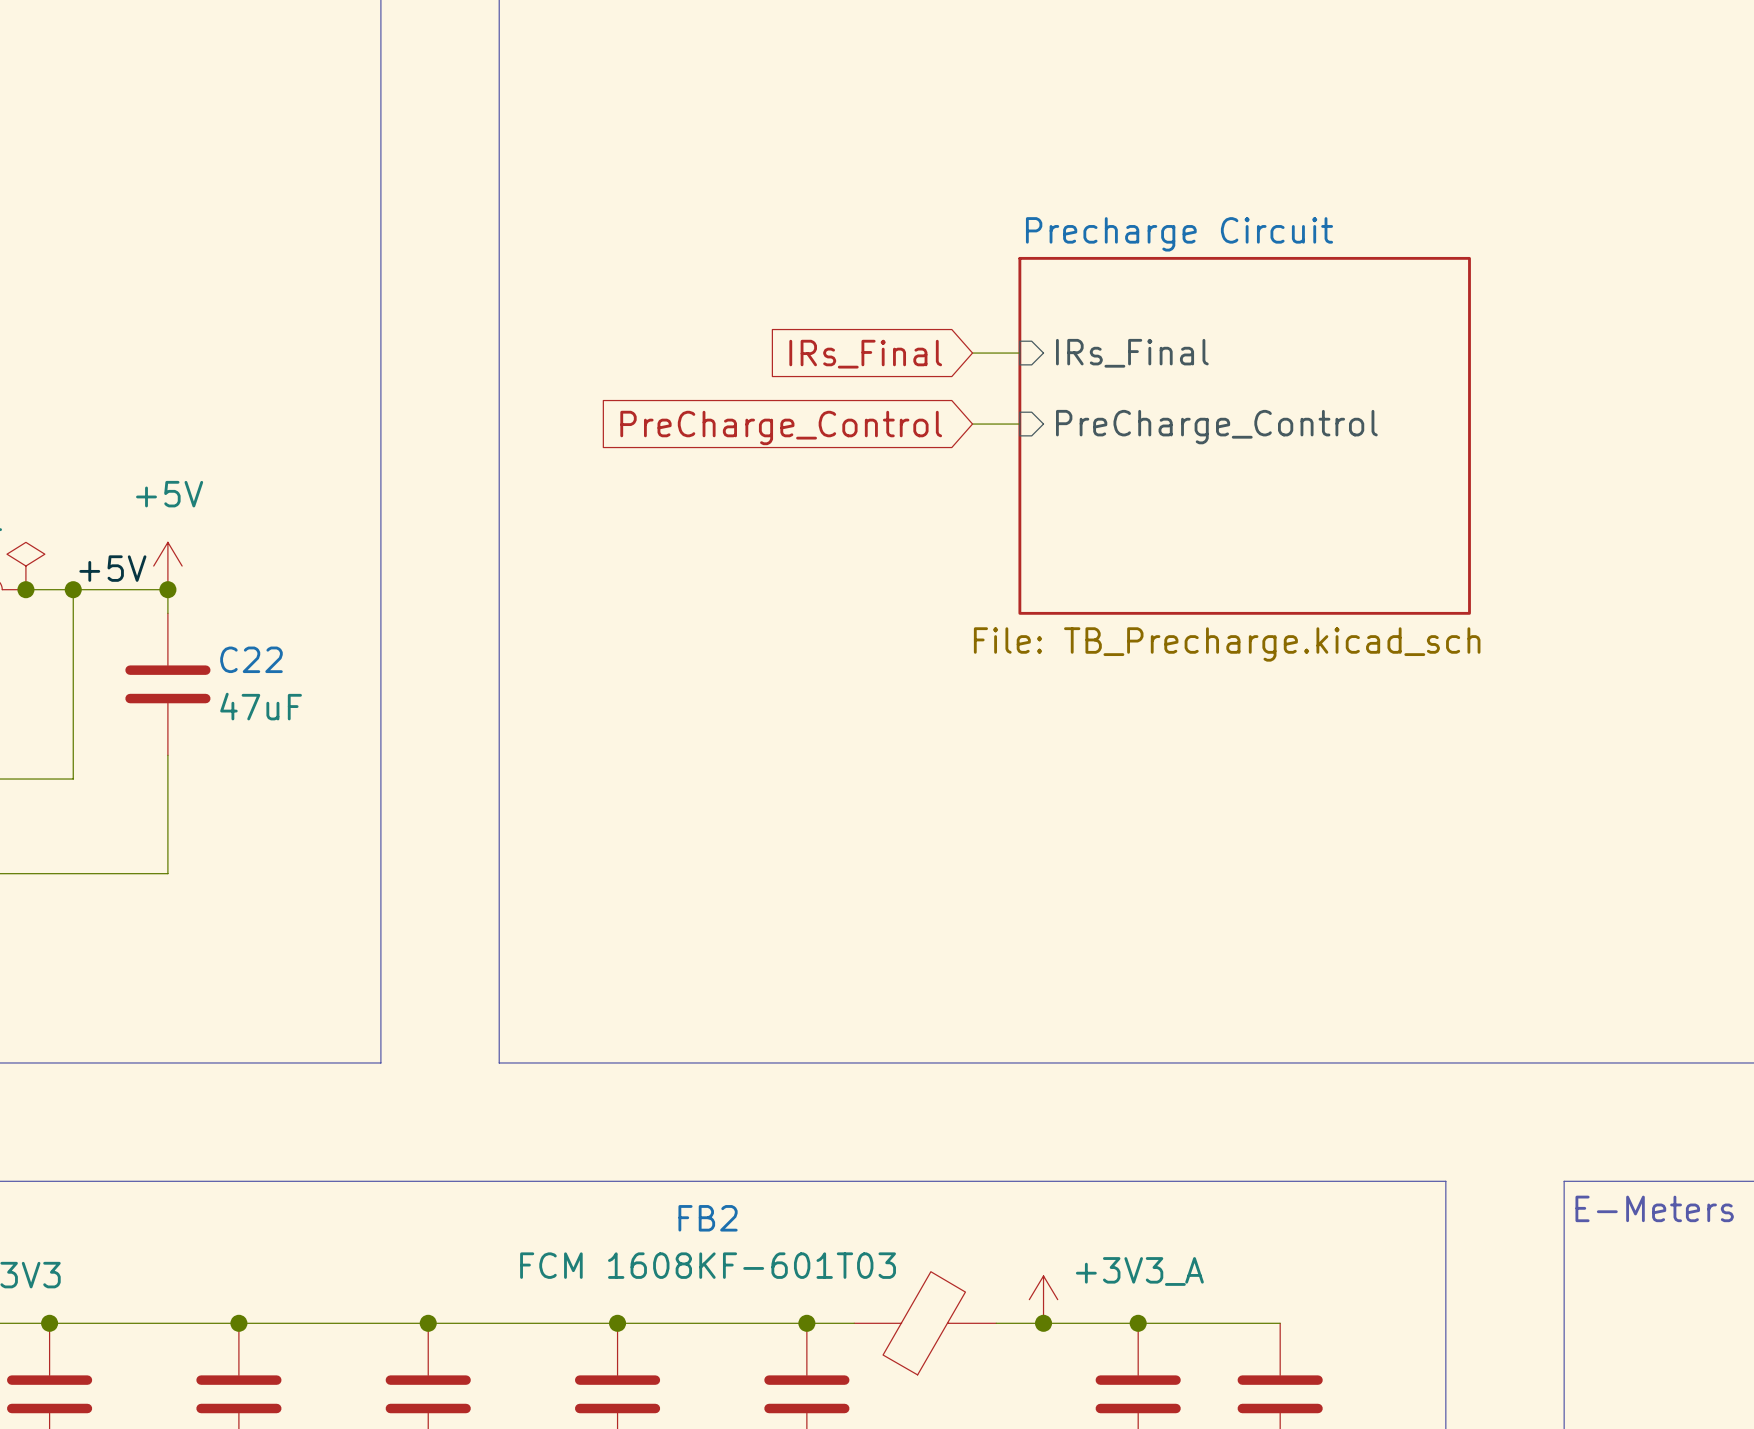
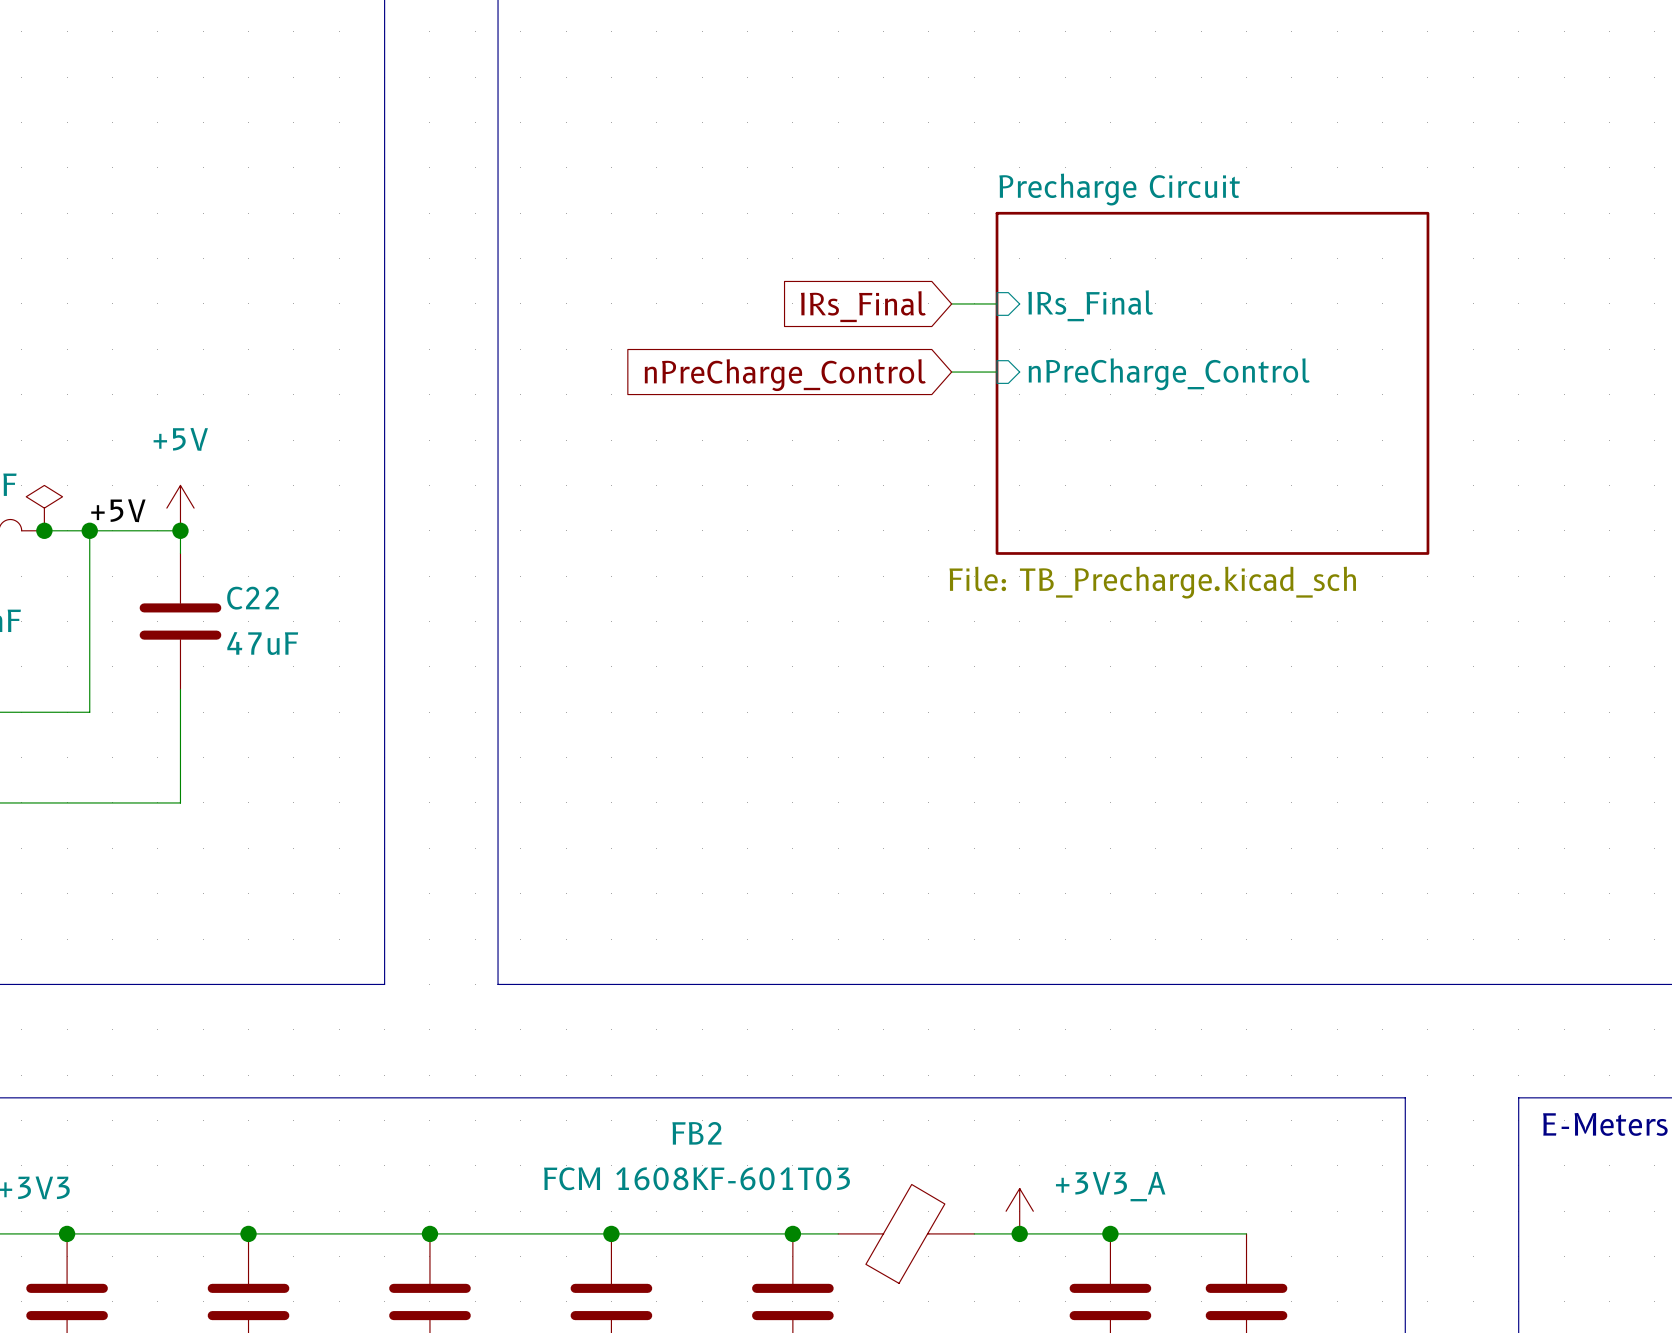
global label: PreCharge_Control (781, 427) -> nPreCharge_Control (785, 375)
sheet pin: PreCharge_Control (1216, 427) -> nPreCharge_Control (1169, 374)

